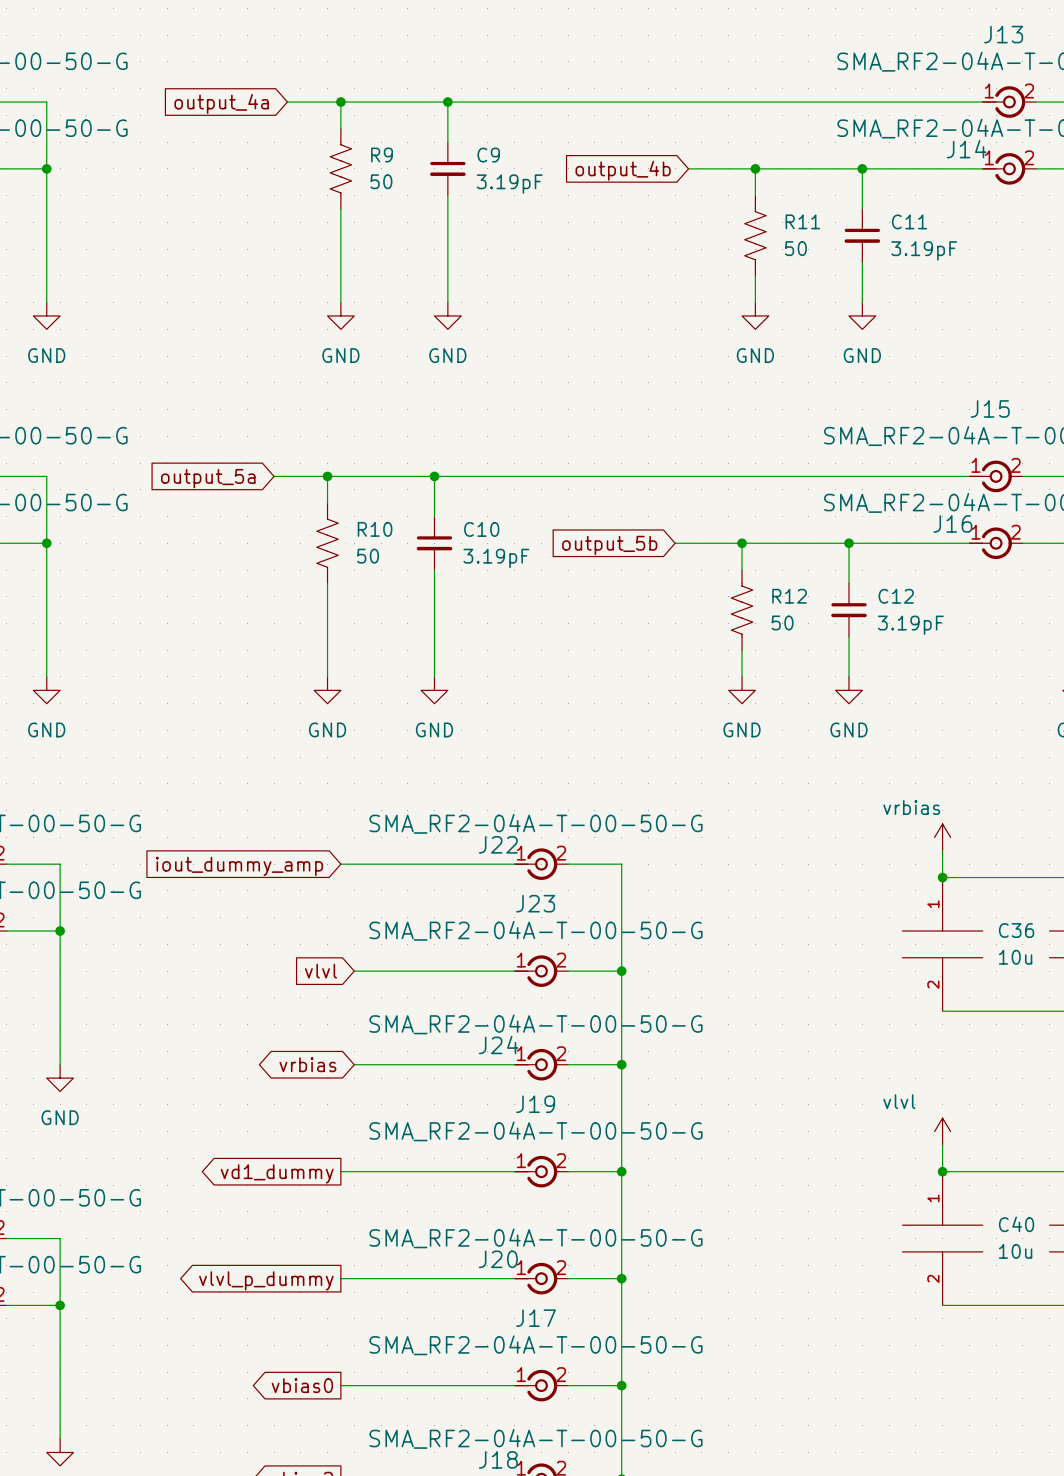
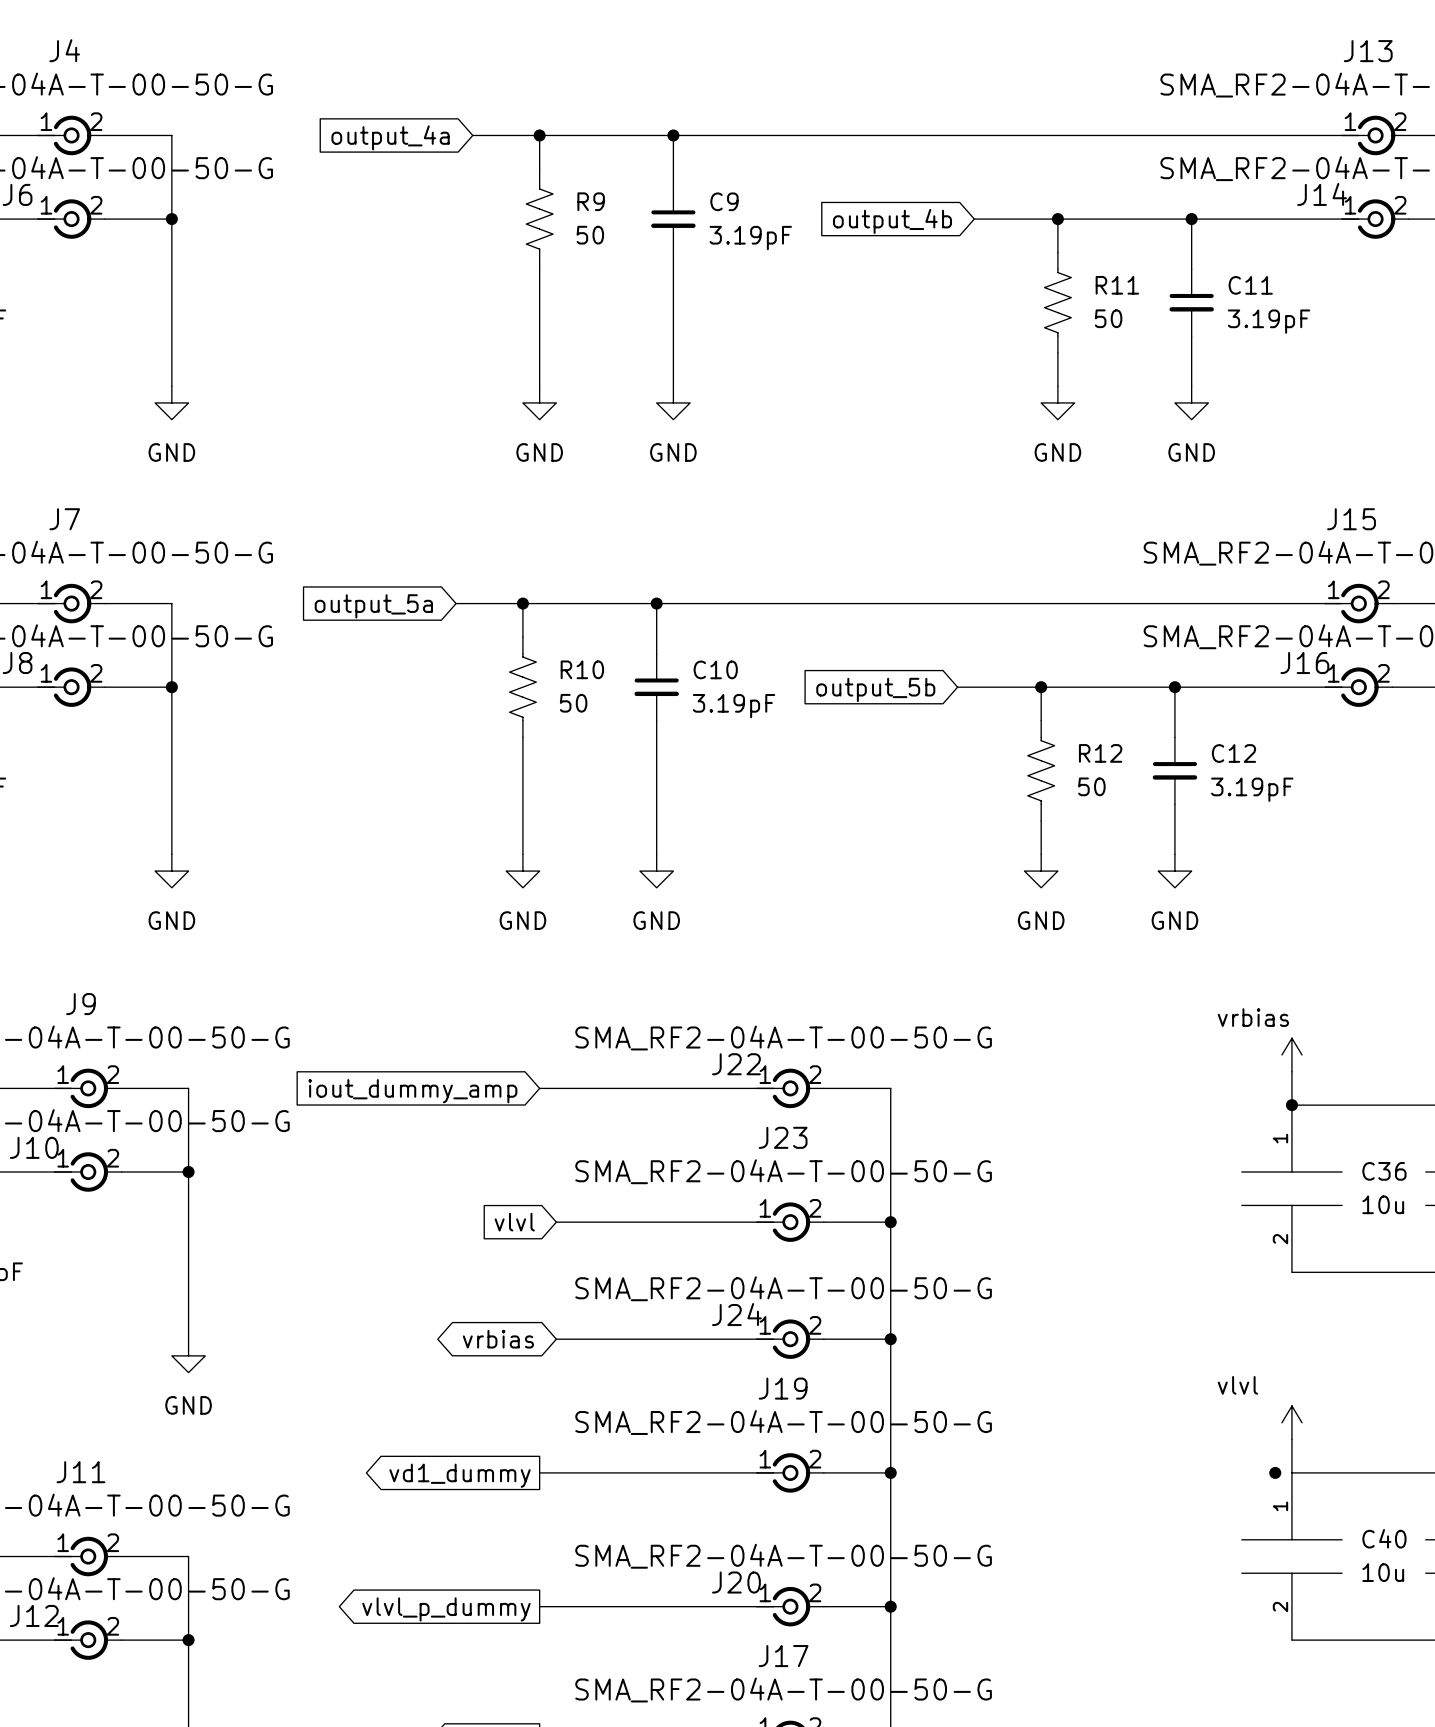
junction position: (942, 1171) -> (1275, 1472)

